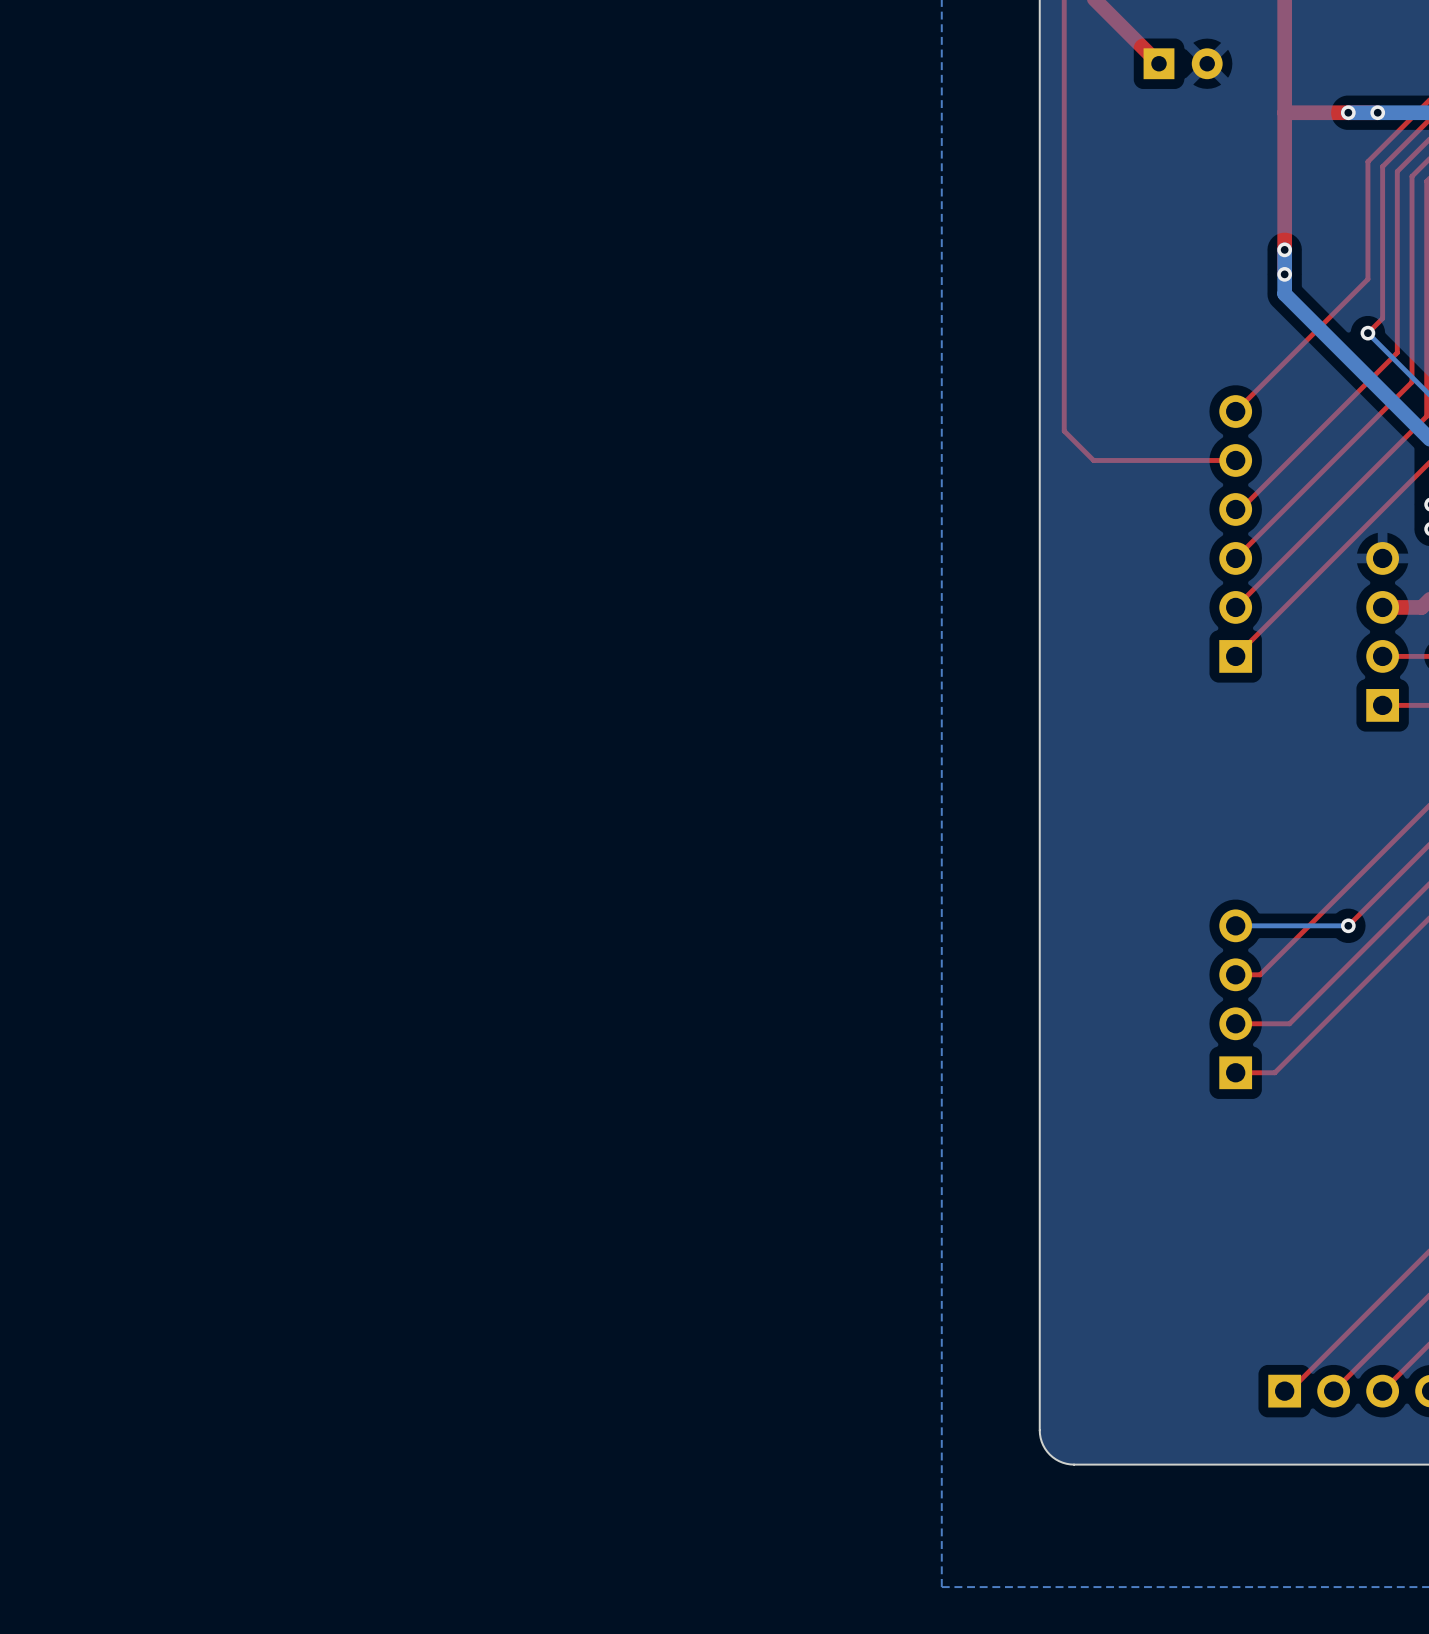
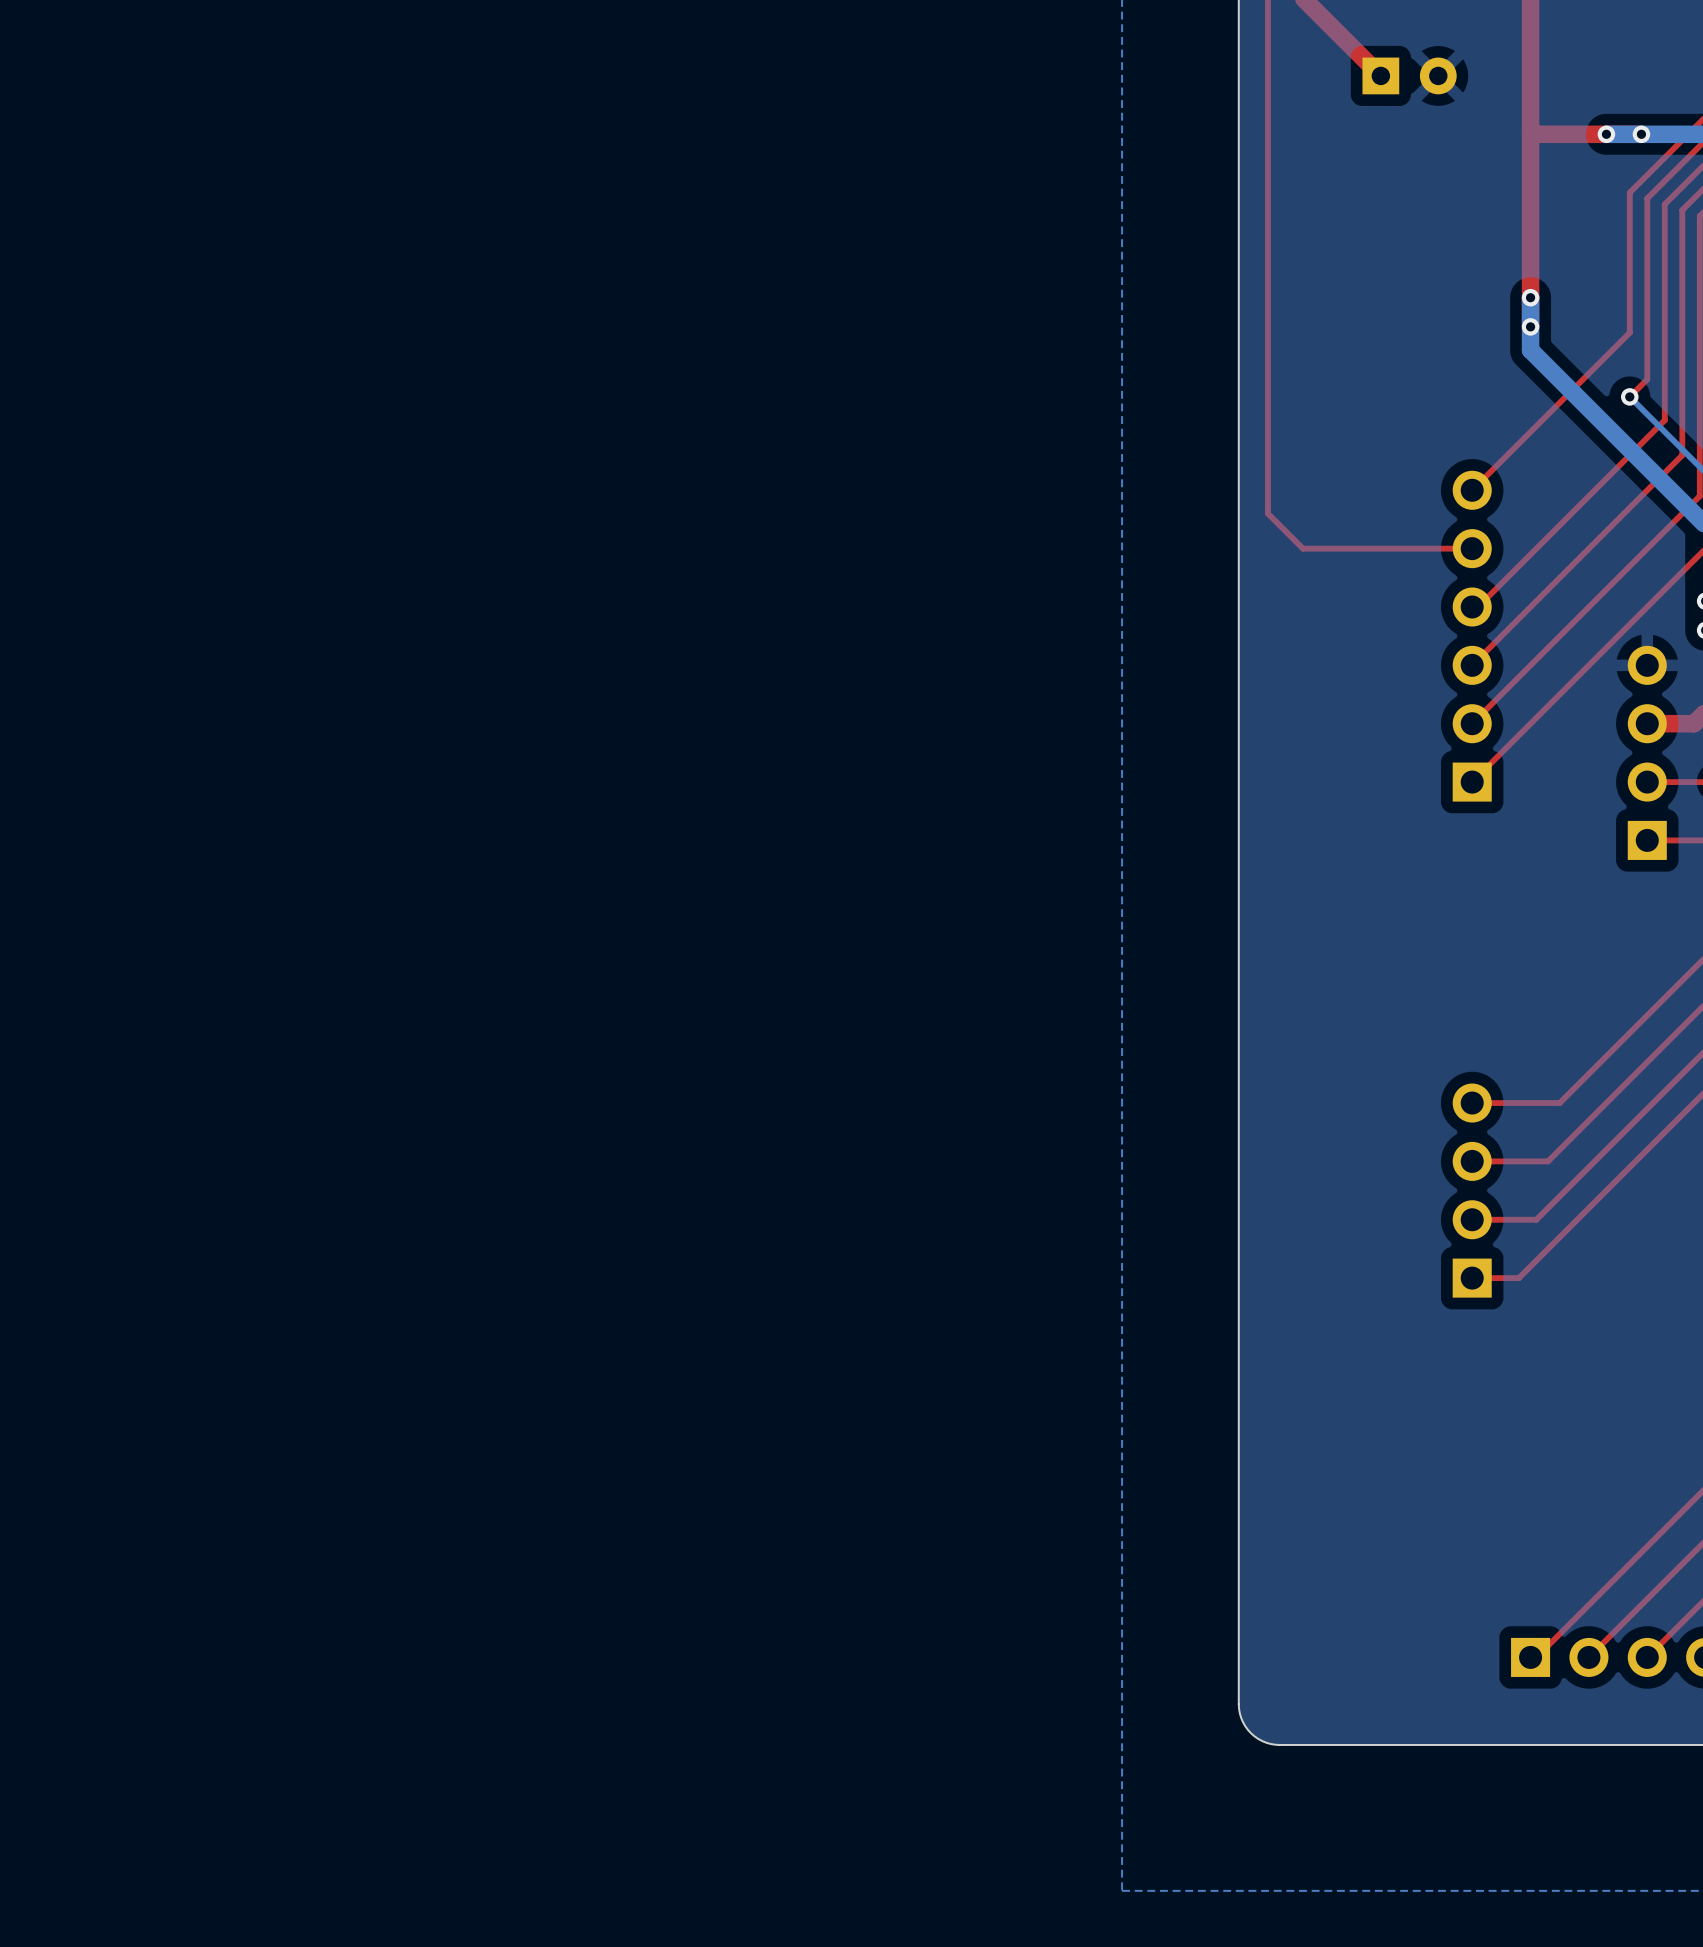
top track: (1309, 925) (1260, 974) -> (1606, 1103) (1548, 1161) (1501, 1161)
top track: none -> (1559, 1103) (1472, 1103)
bottom track: (1348, 925) (1235, 925) -> none
via: (1348, 925) -> none

